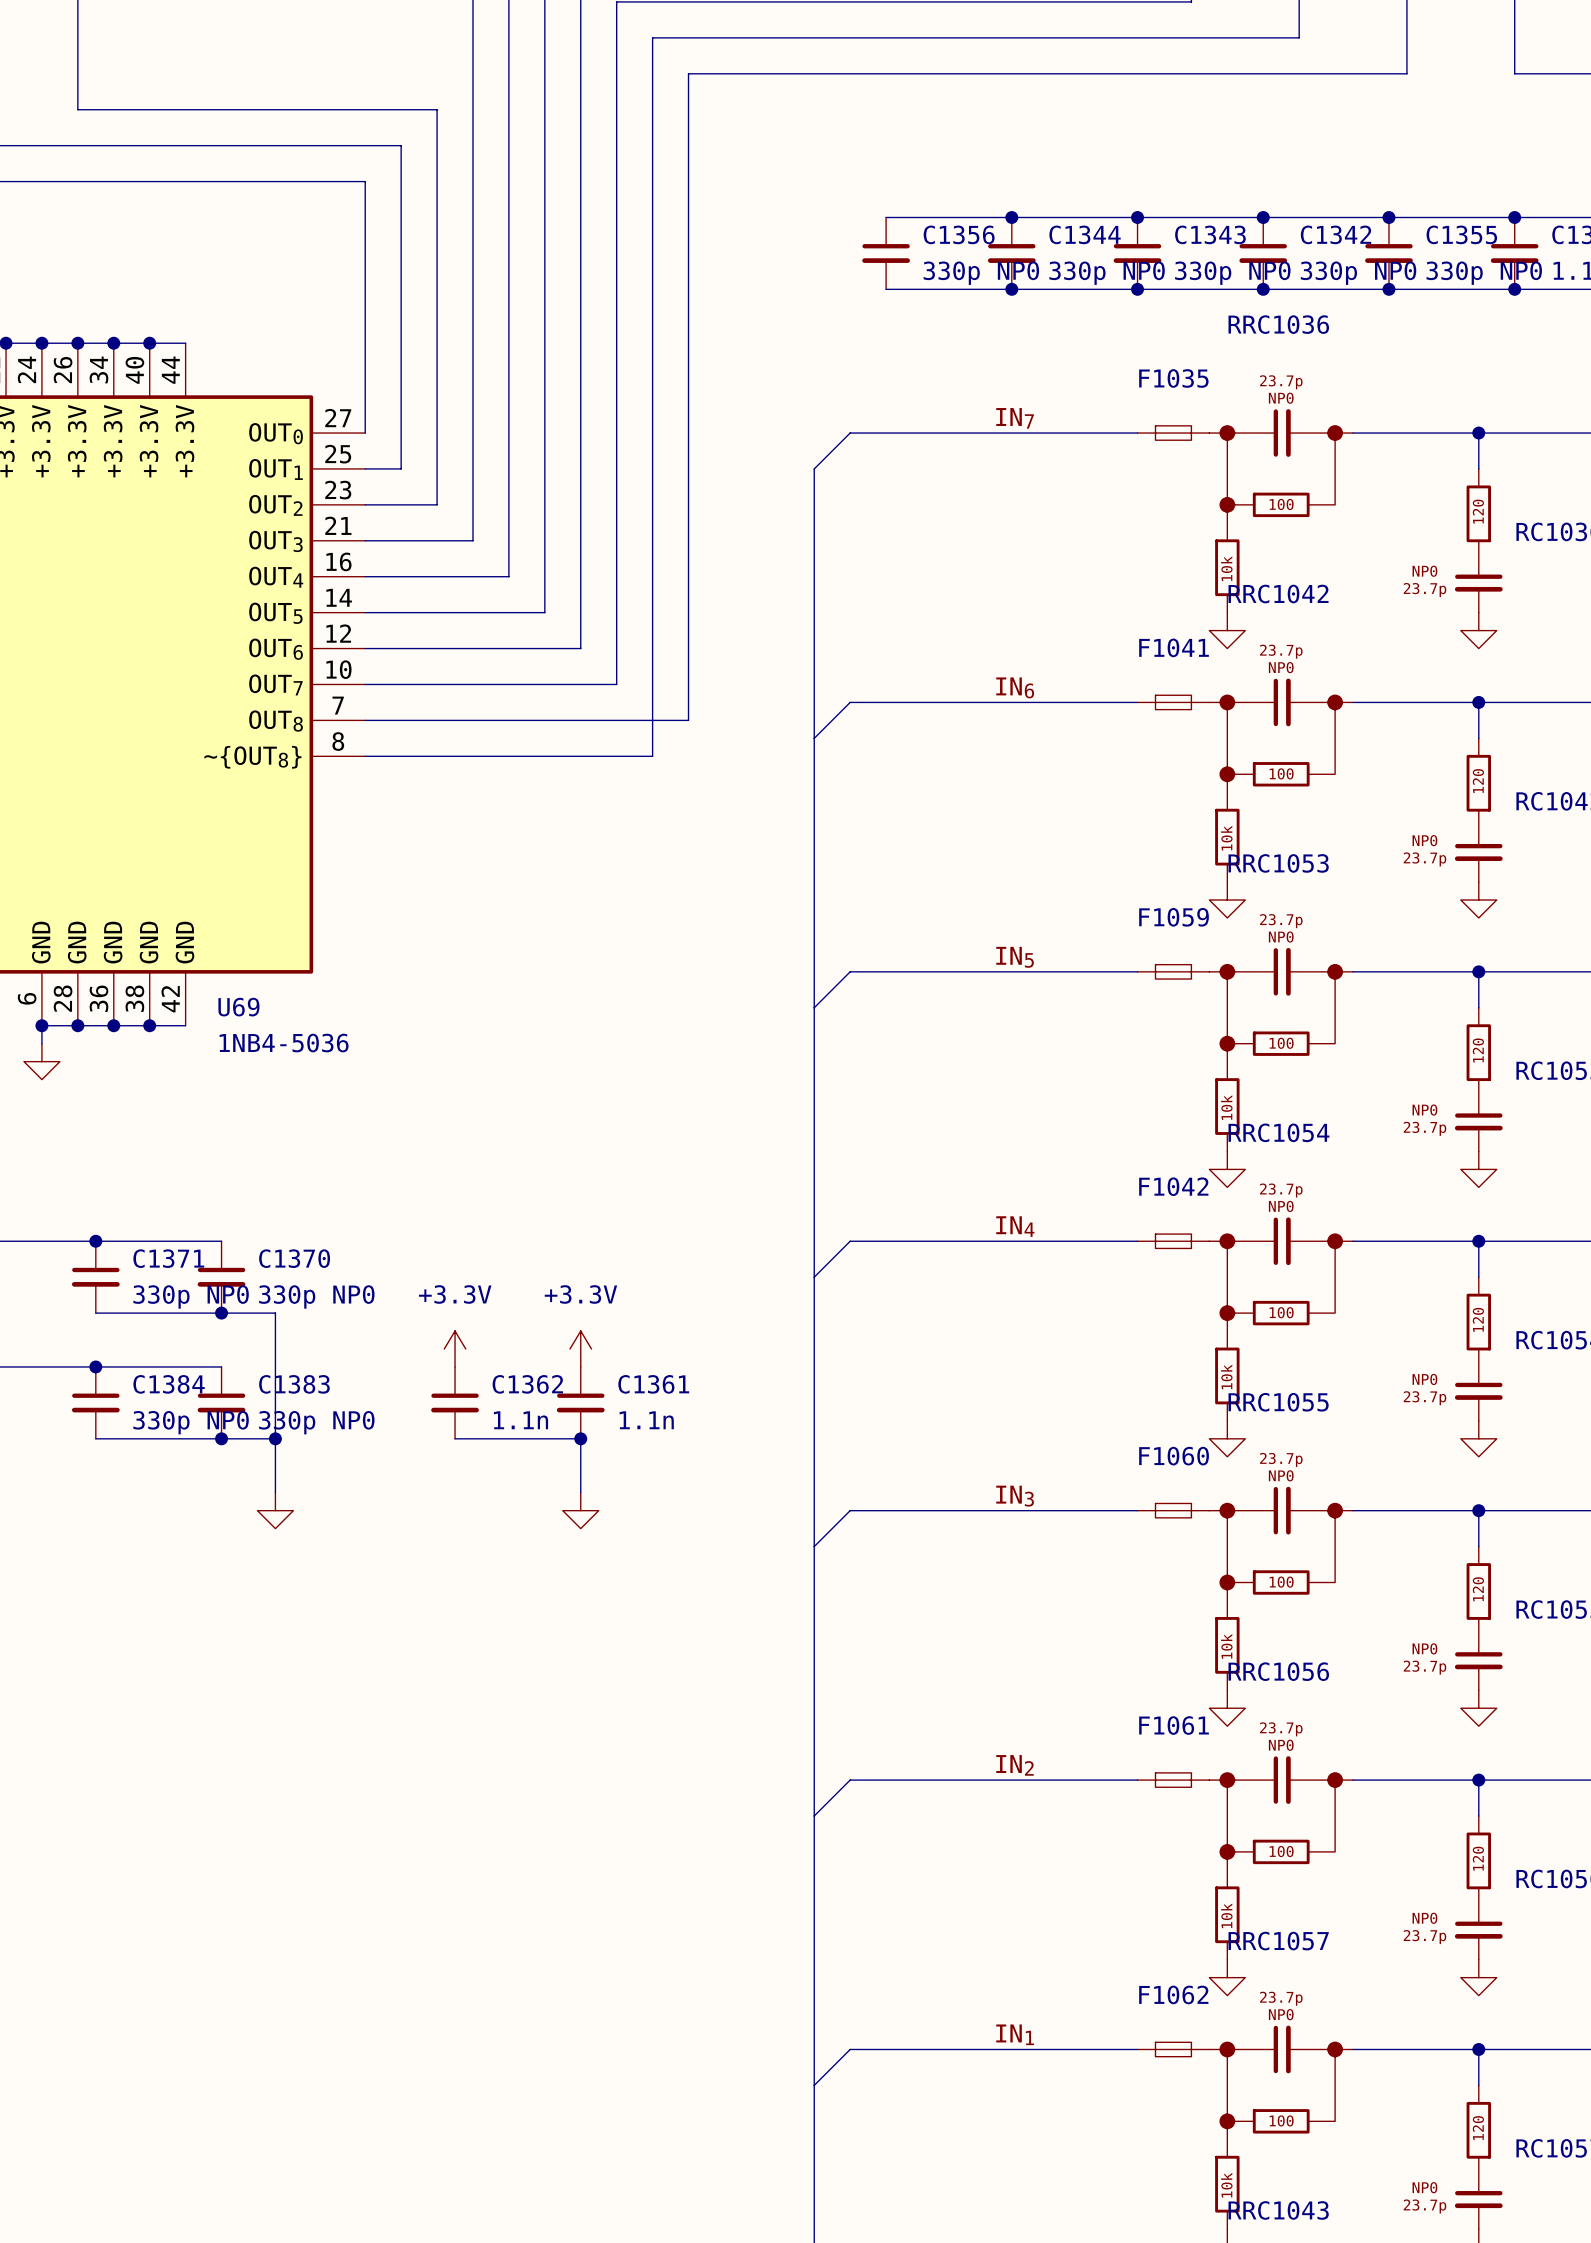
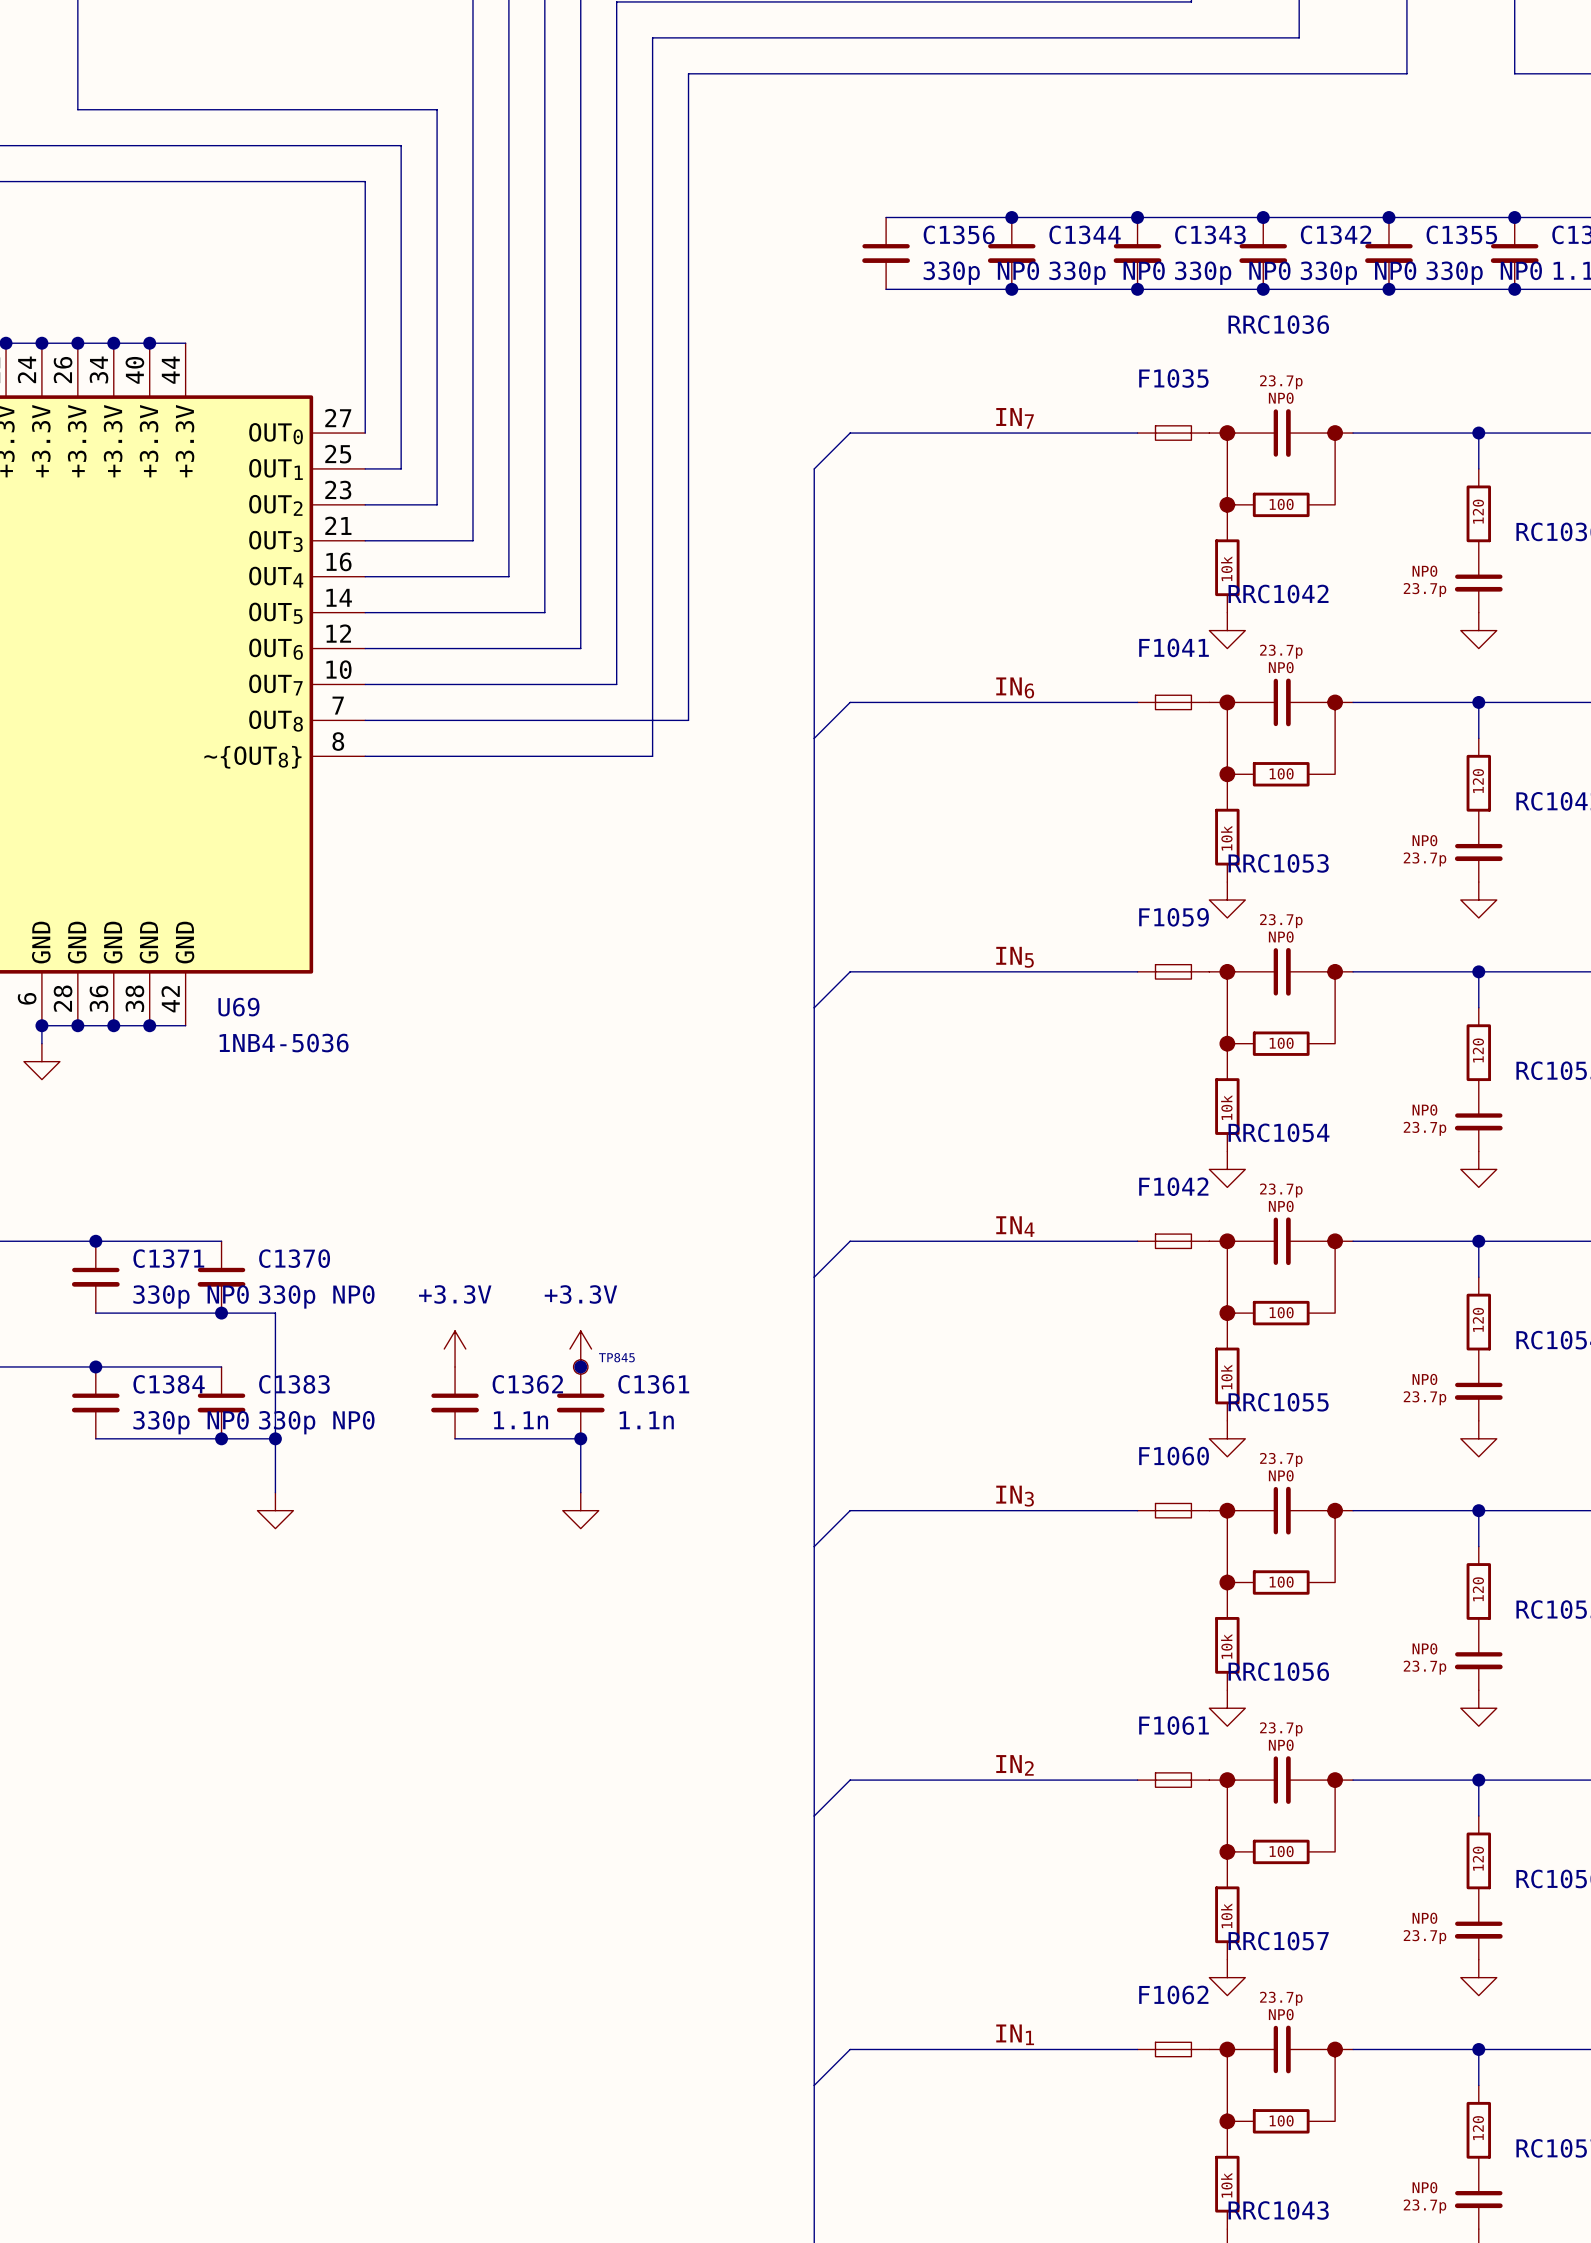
junction: none -> (580, 1366)
TP845: none -> (580, 1366)

